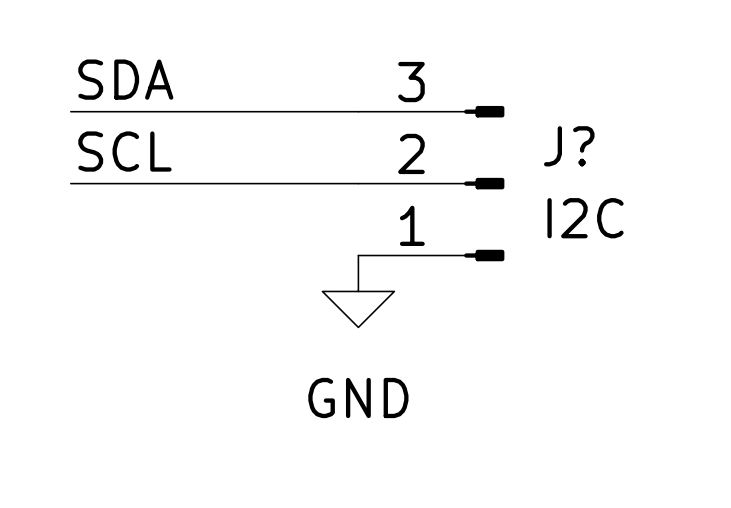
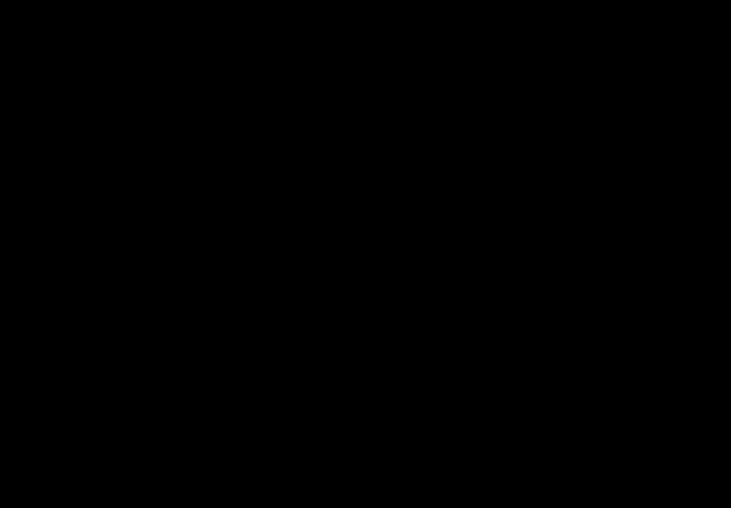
label: SDA (125, 79) -> none
wire: (70, 111) (358, 111) -> none
label: SCL (124, 151) -> none
wire: (70, 183) (358, 183) -> none
J?: I2C (431, 183) -> none
power symbol: GND (358, 291) -> none

